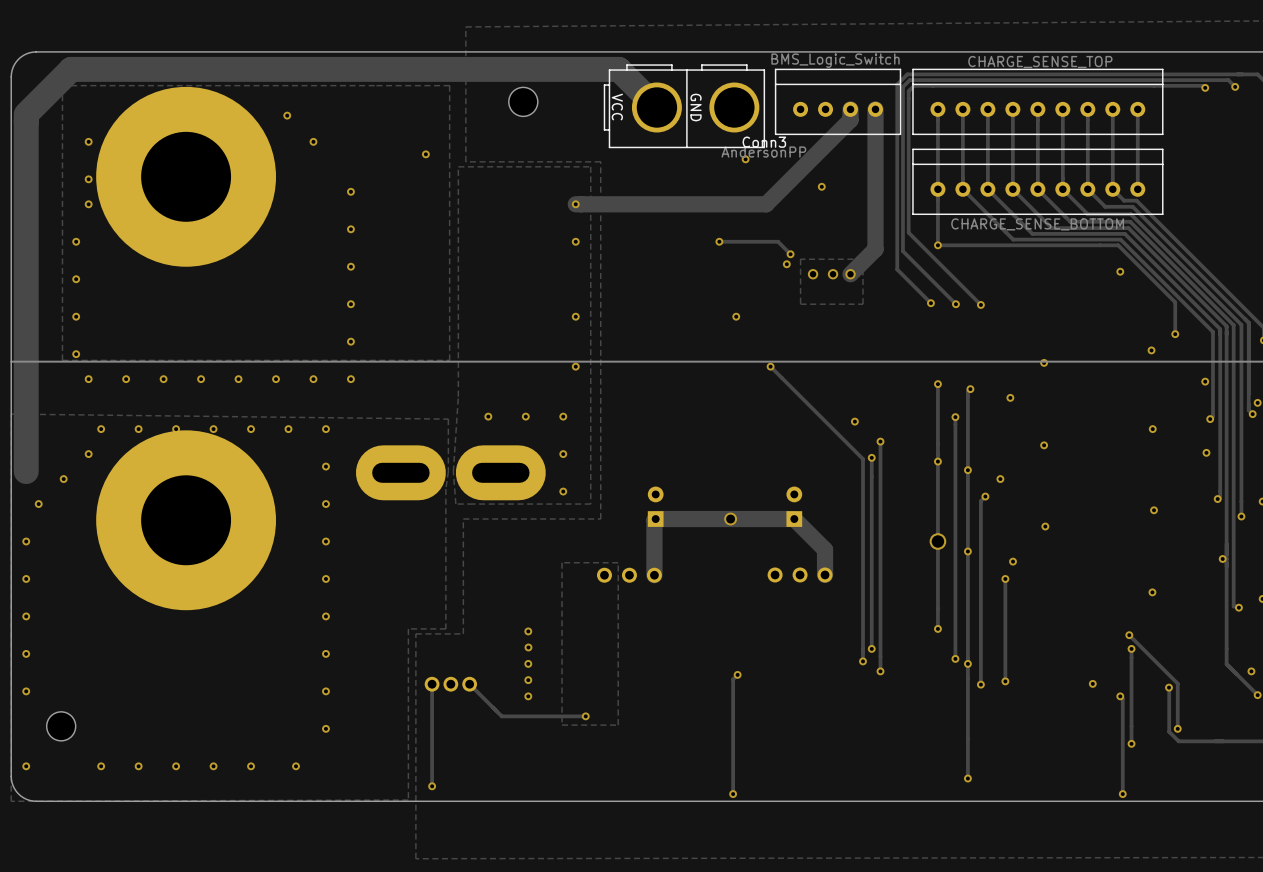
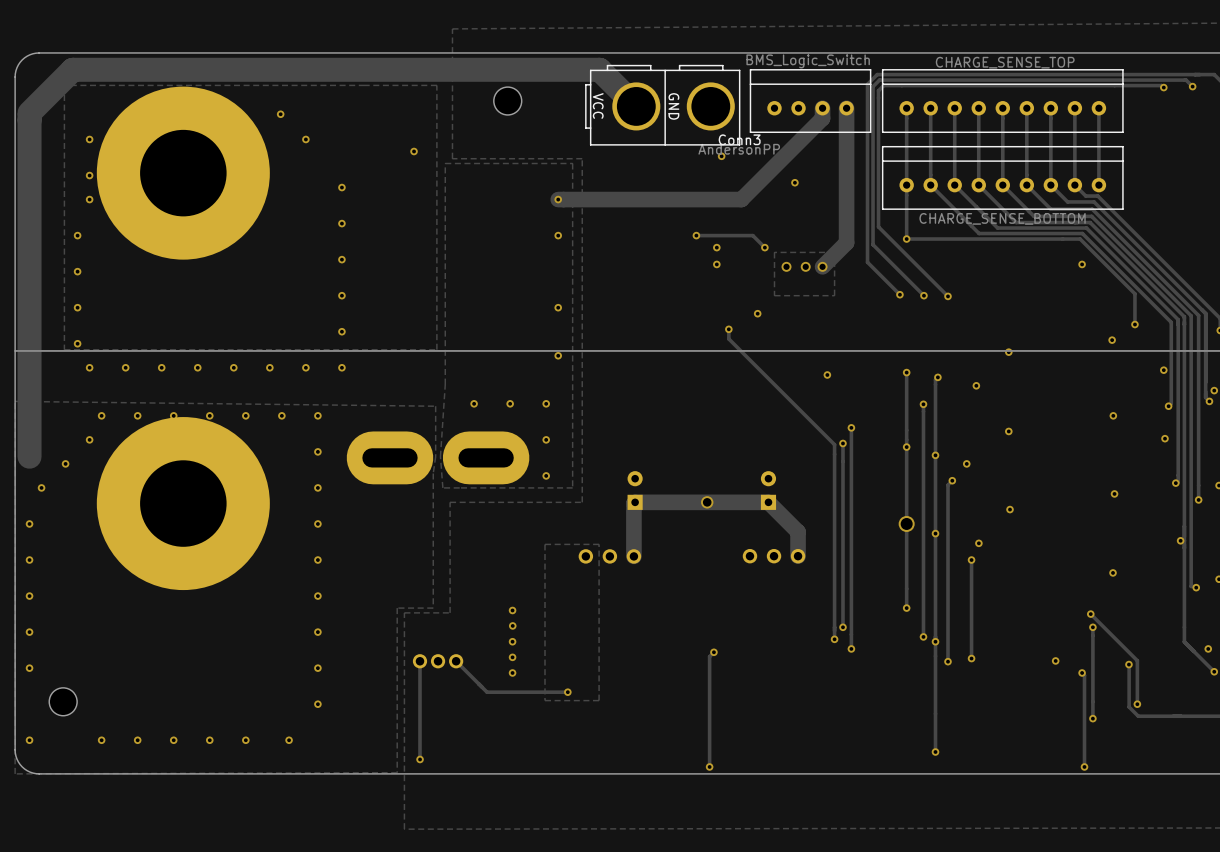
via: none -> (716, 247)
via: (786, 264) -> none
via: none -> (716, 264)
via: (736, 316) -> none
via: none -> (757, 313)
track: none -> (728, 329) (728, 338) (745, 355)
via: none -> (728, 329)
via: (770, 366) -> none
via position: (854, 421) -> (827, 374)

